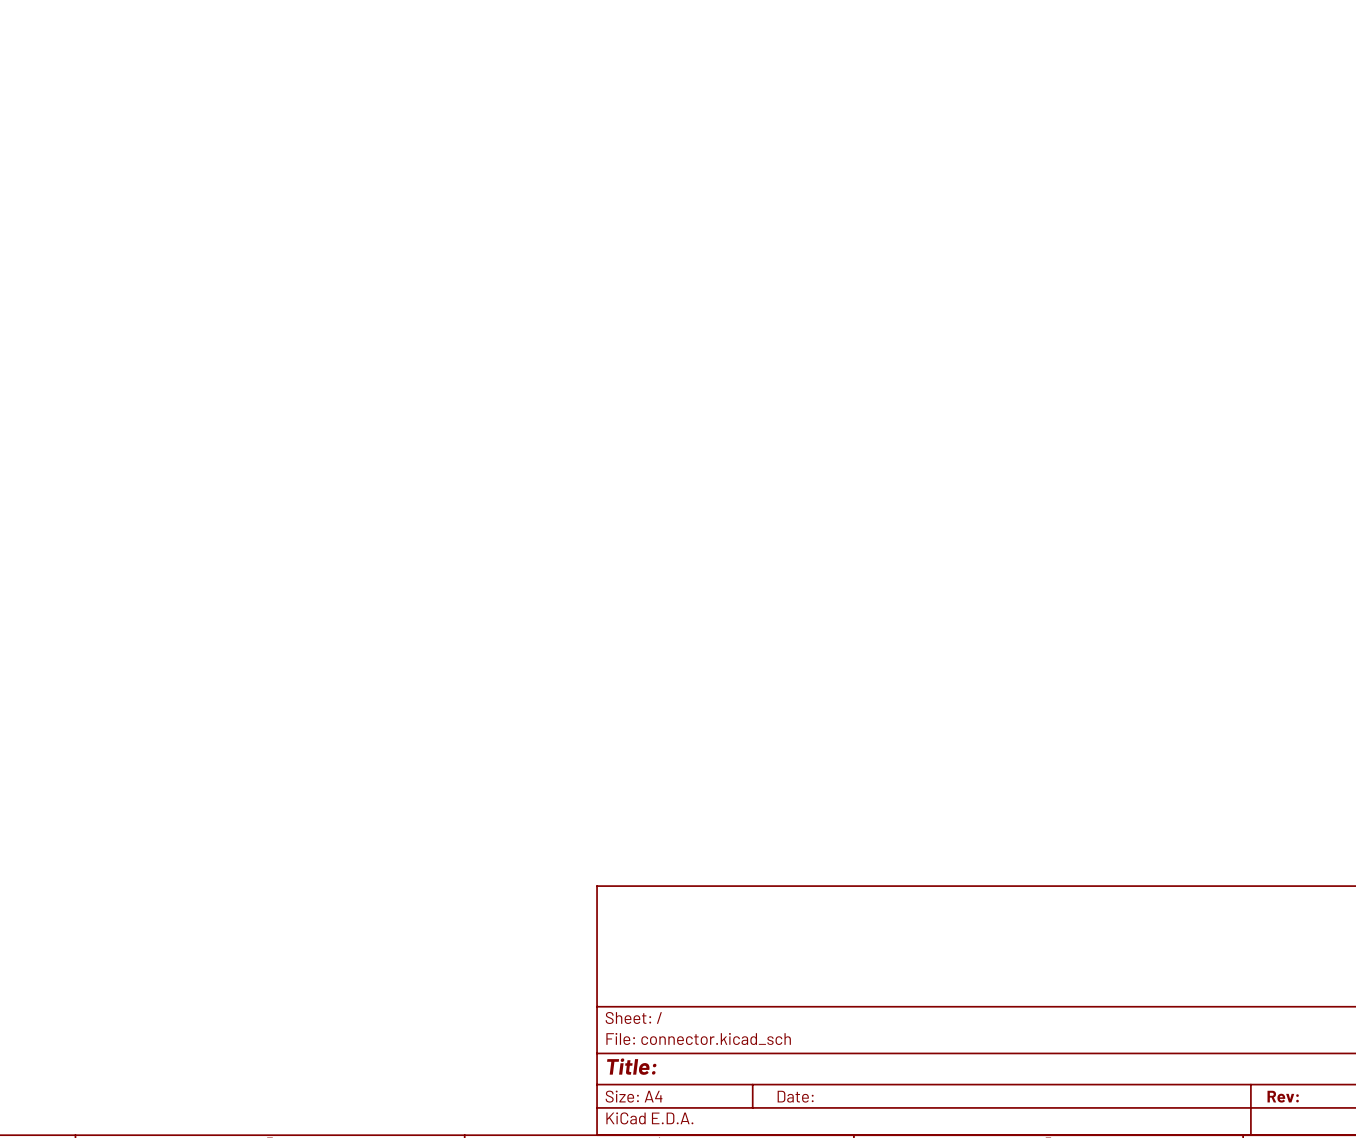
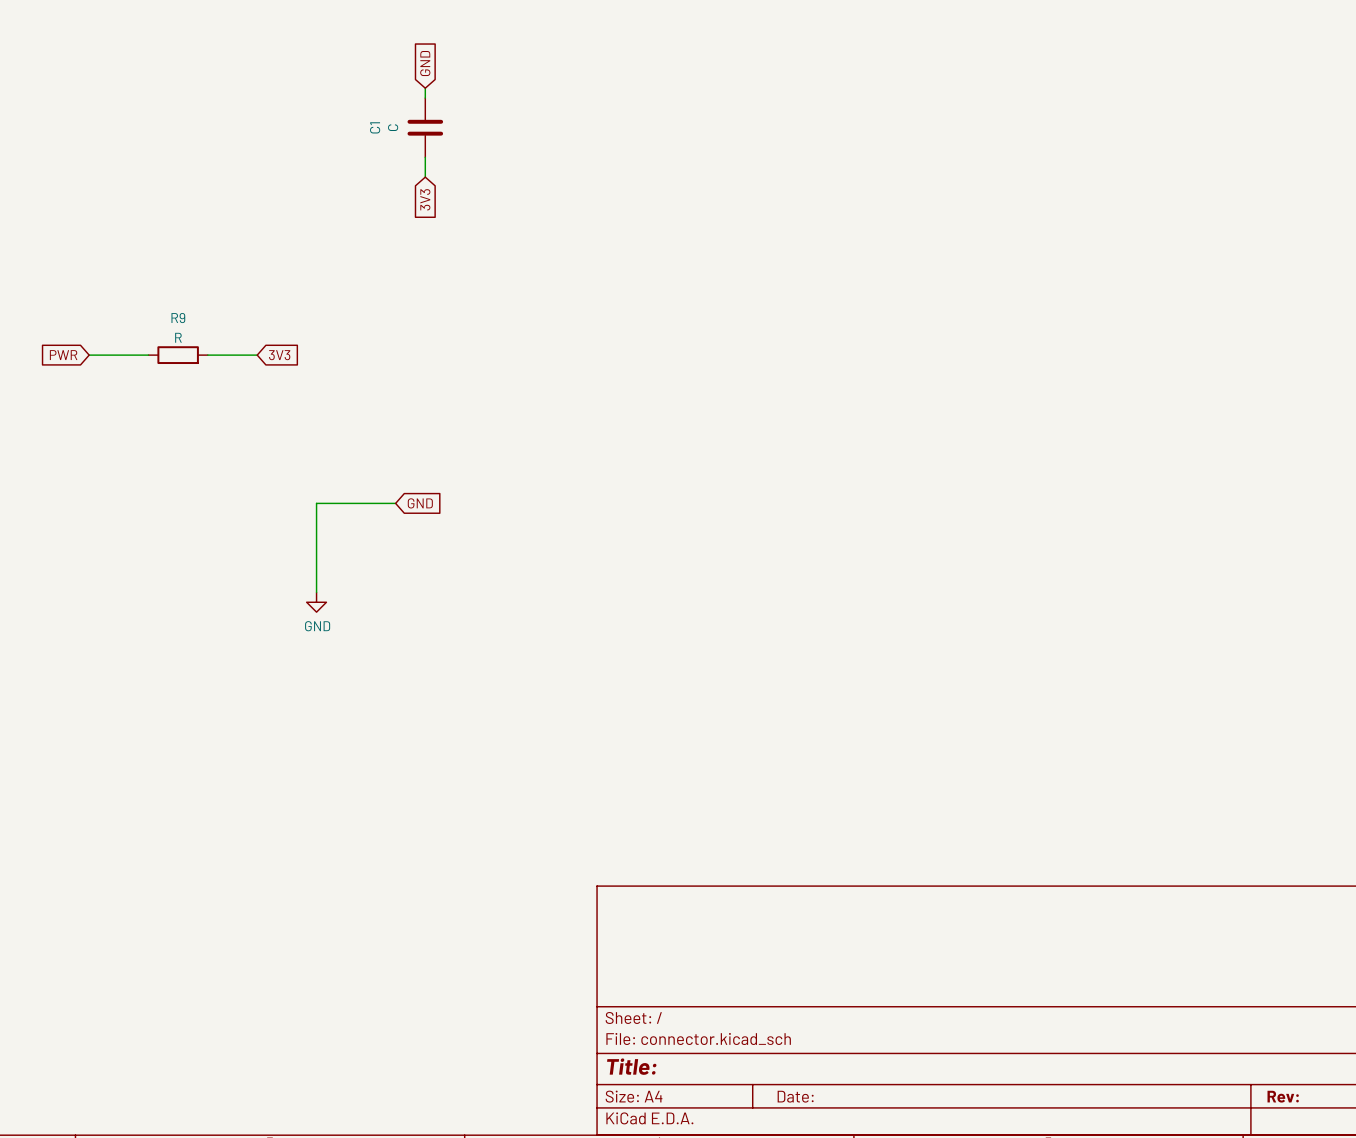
global label: none -> GND (425, 63)
wire: none -> (425, 88) (425, 98)
C1: none -> C (425, 127)
wire: none -> (425, 157) (425, 177)
global label: none -> 3V3 (425, 199)
global label: none -> PWR (63, 355)
wire: none -> (89, 355) (148, 355)
R9: none -> R (178, 355)
wire: none -> (207, 355) (257, 355)
global label: none -> 3V3 (279, 355)
wire: none -> (395, 503) (316, 503) (316, 592)
global label: none -> GND (420, 503)
power symbol: none -> GND (316, 602)

